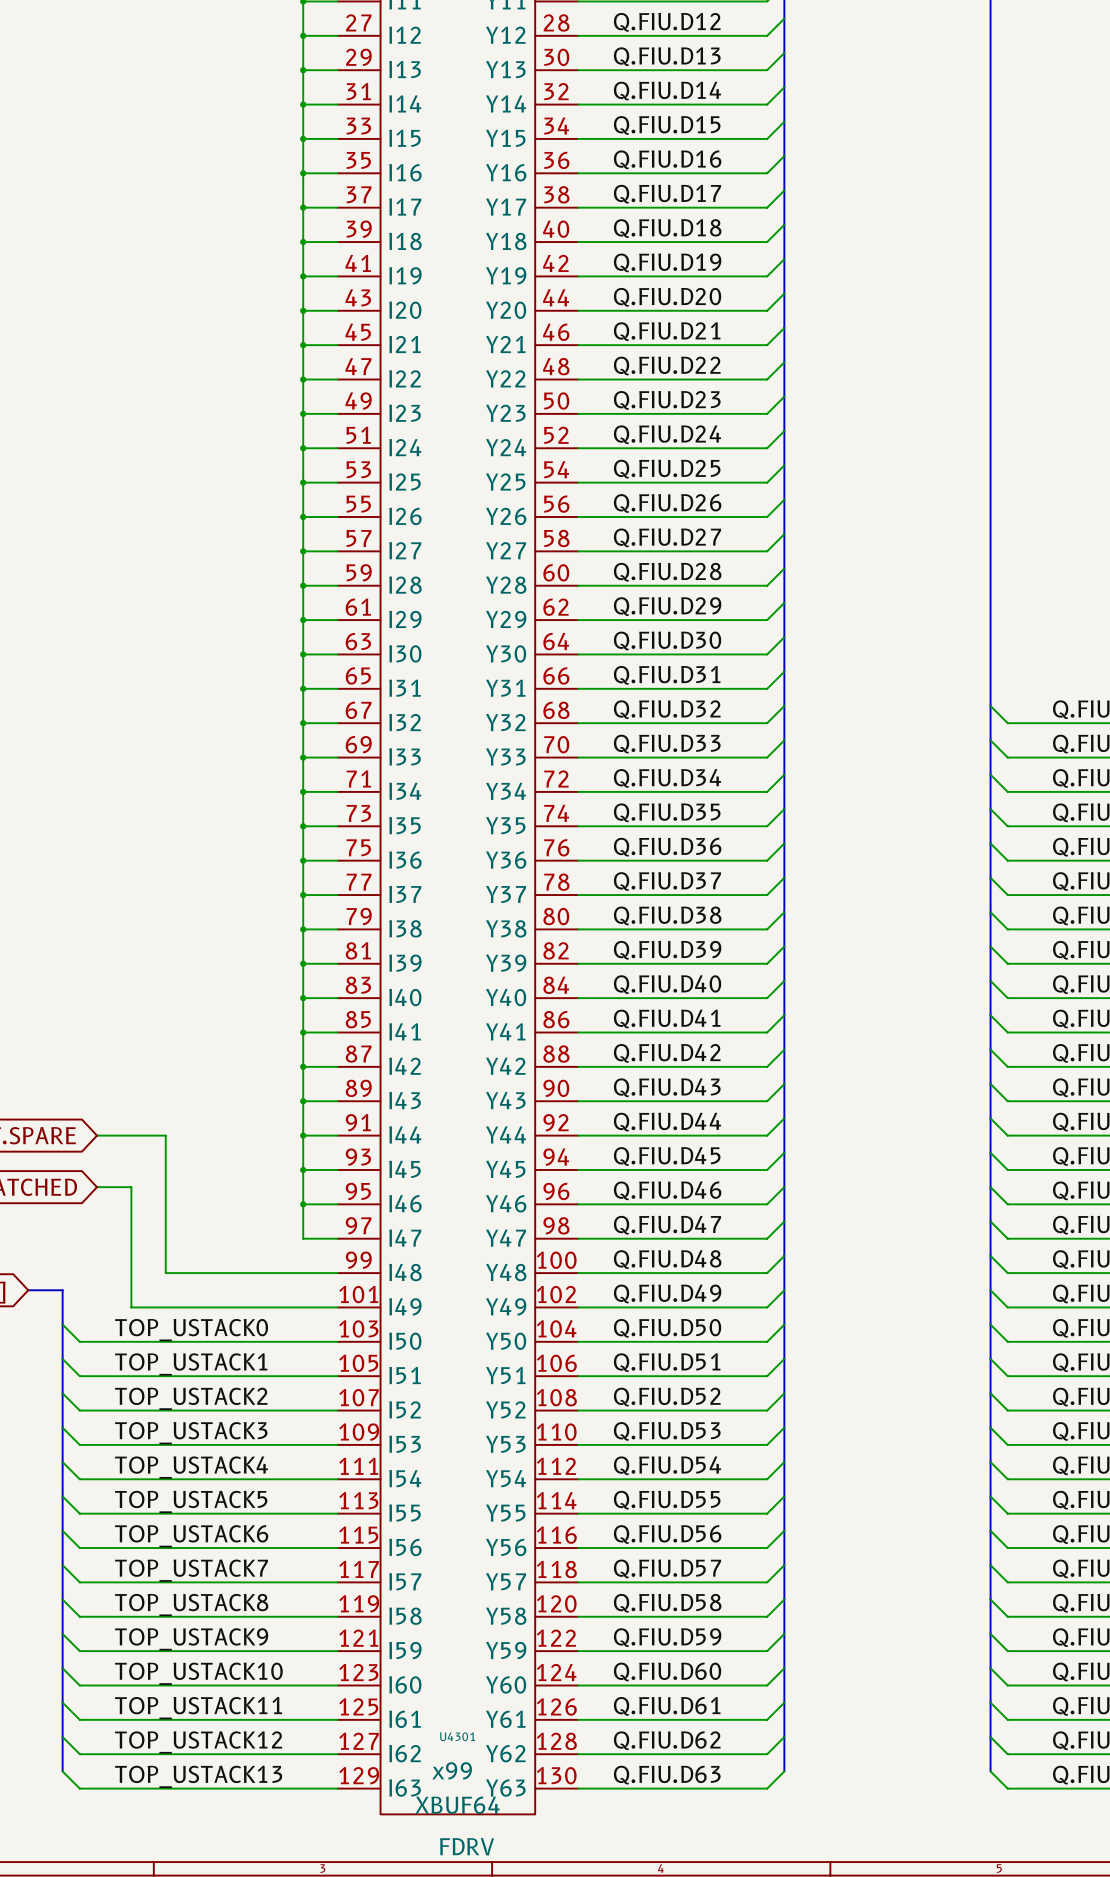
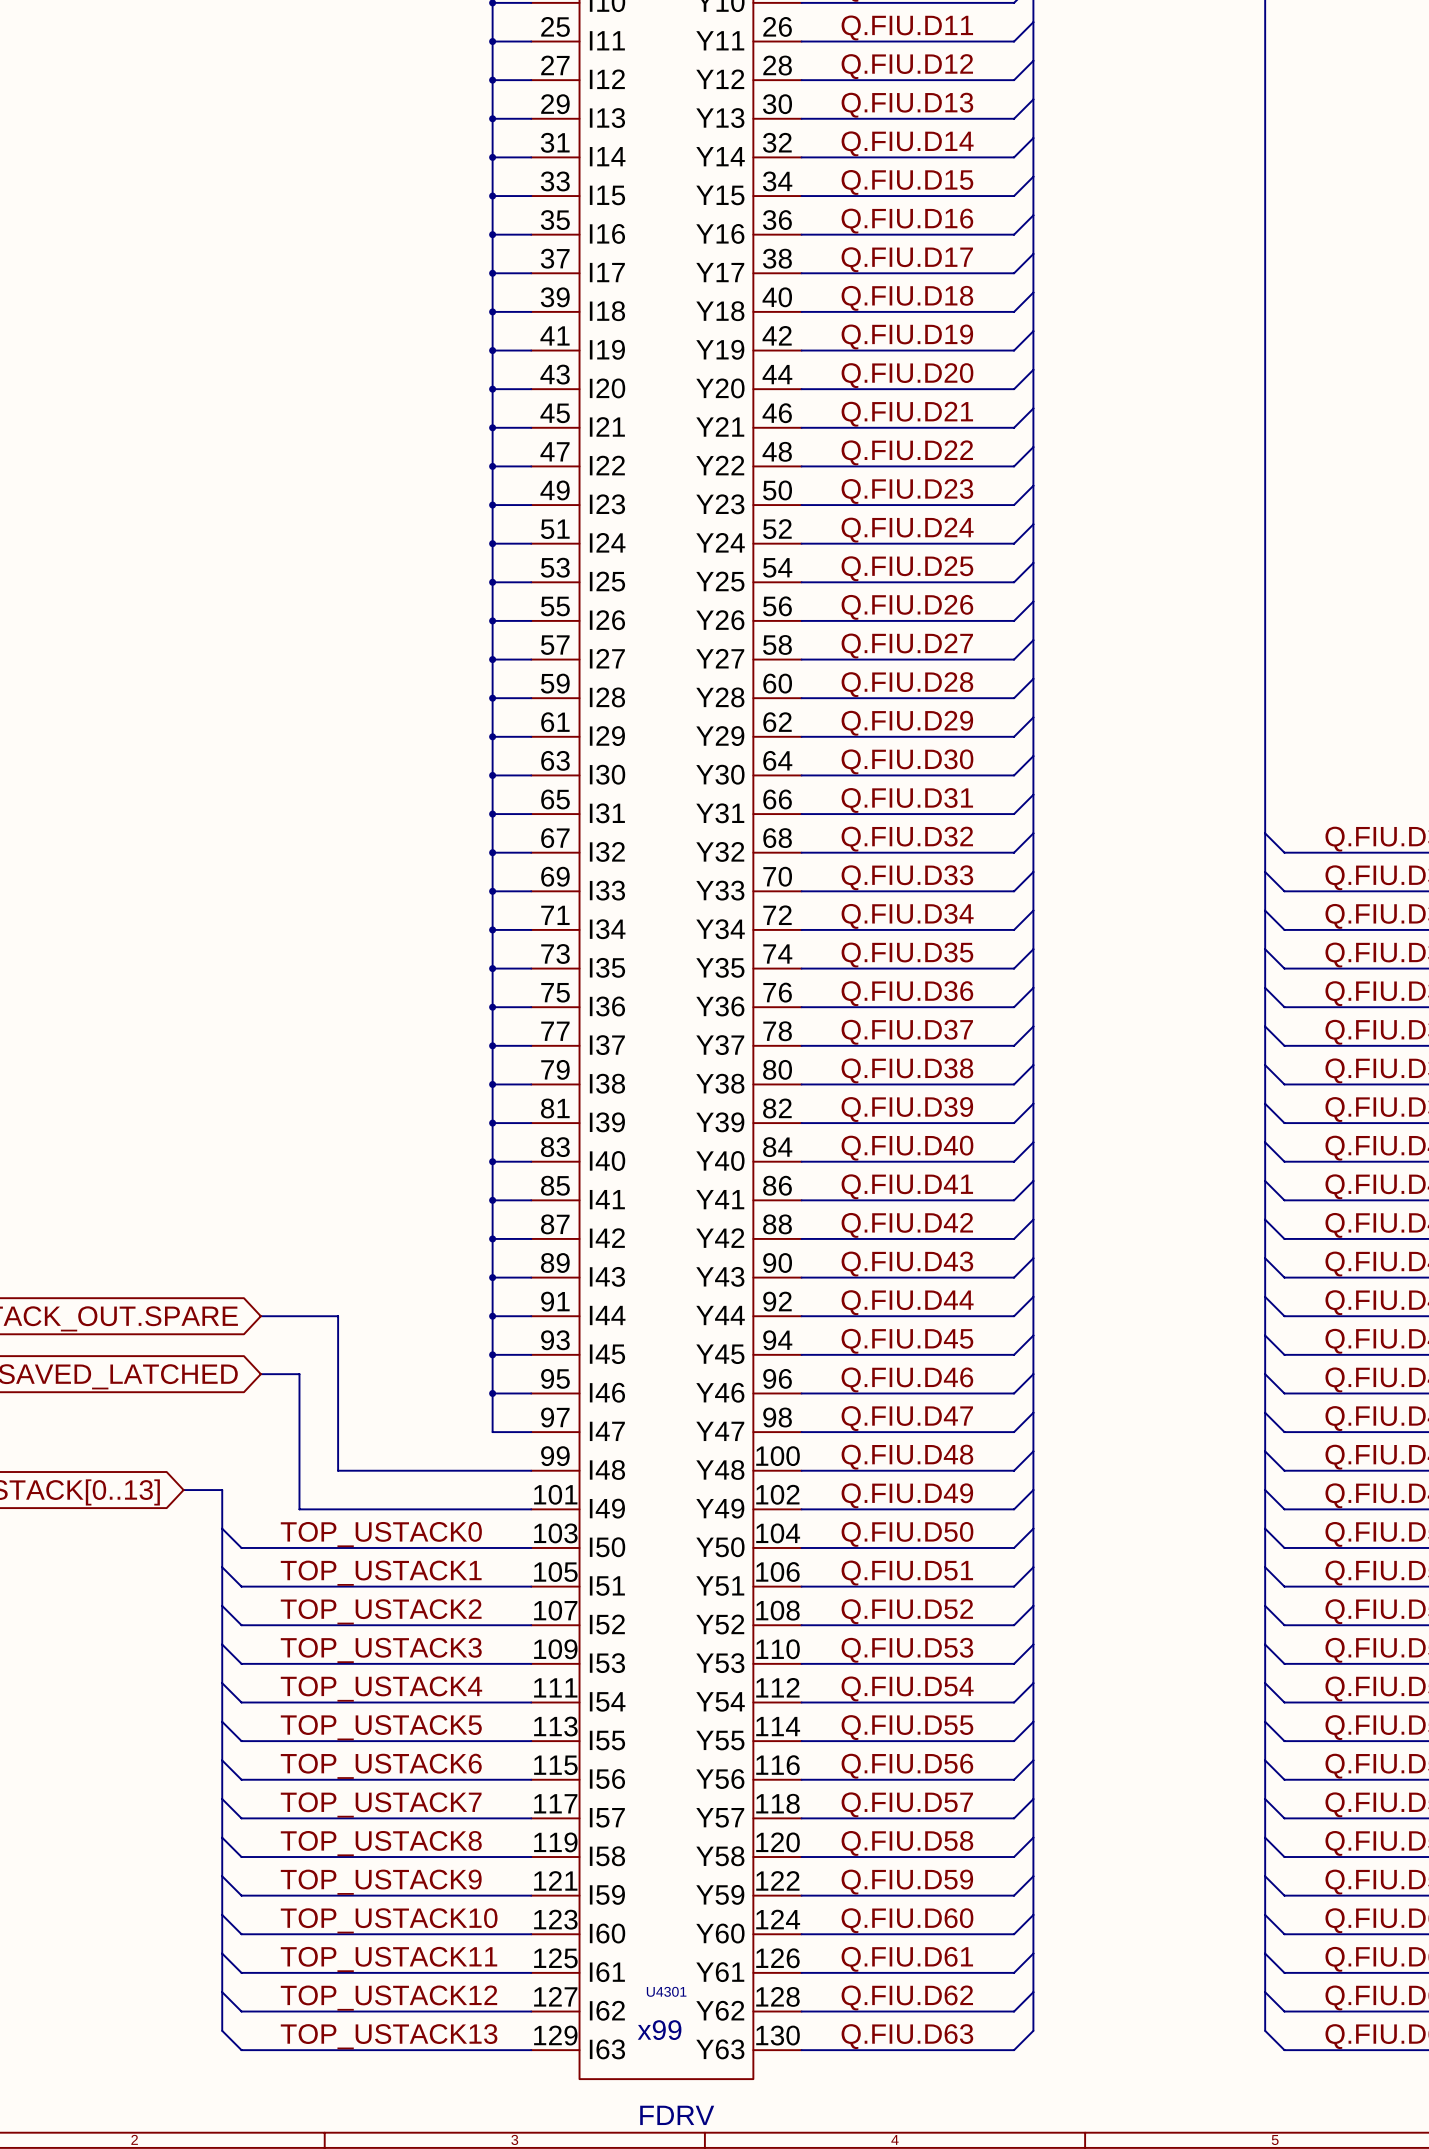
U4301 value: XBUF64 (457, 1805) -> none

